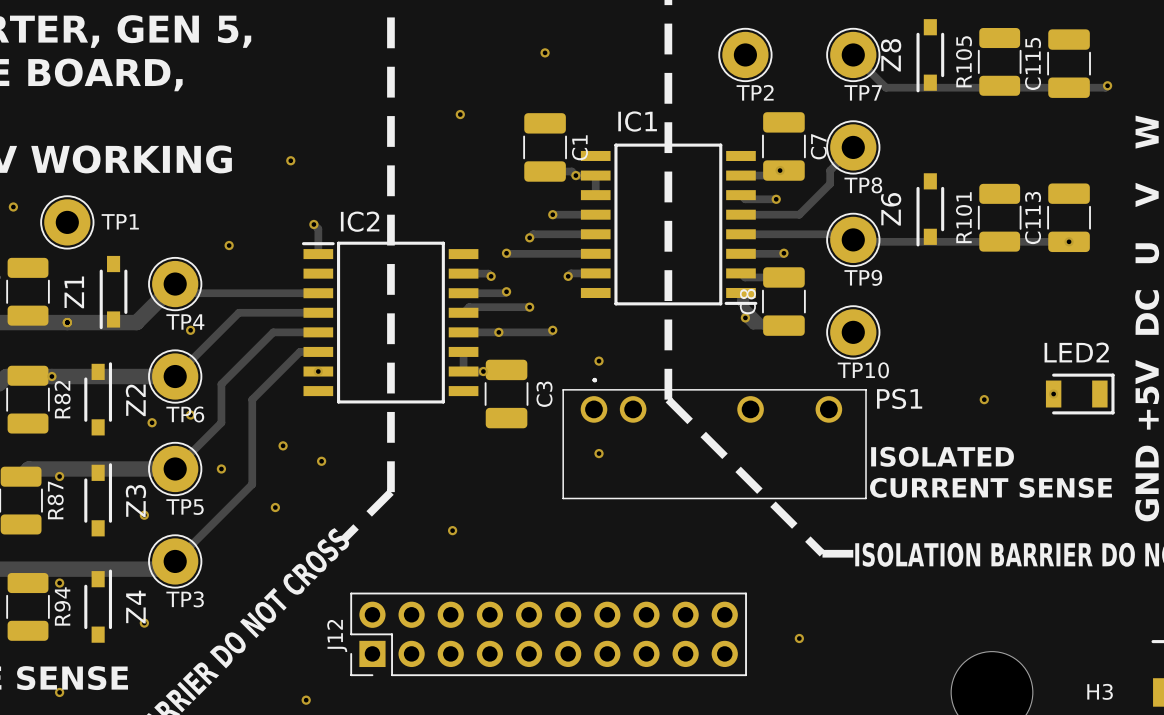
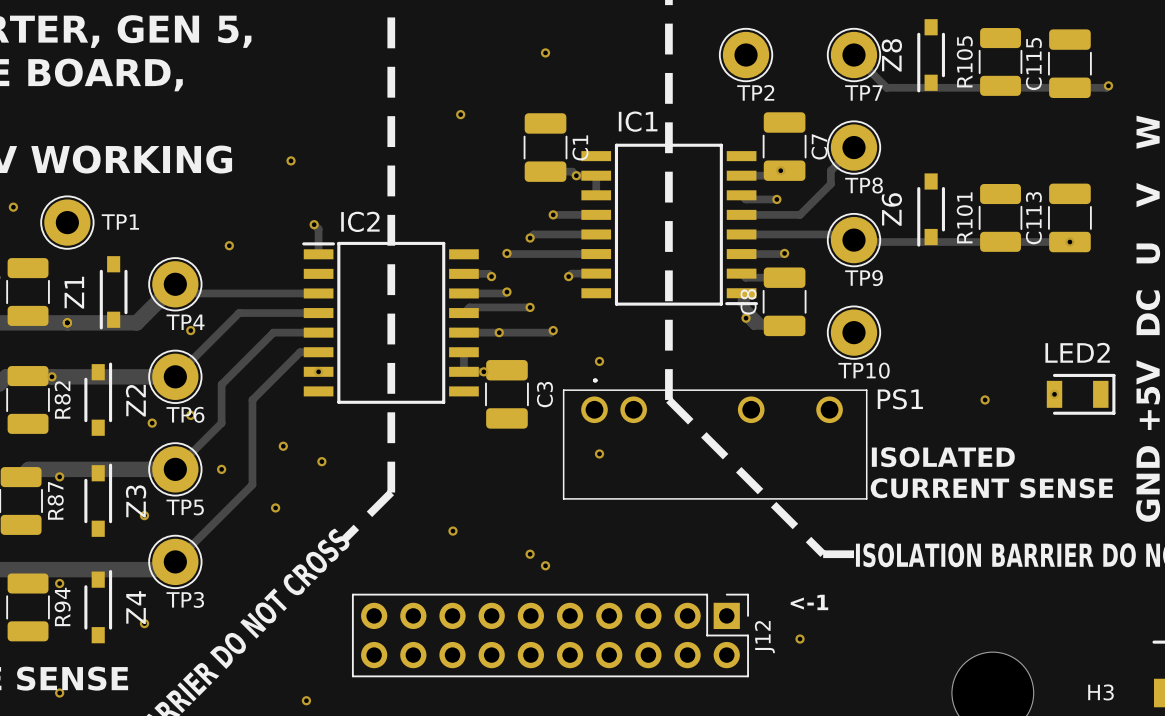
via: none -> (530, 554)
via: none -> (545, 565)
text: none -> <-1 (809, 602)
J12 rotation: 0° (548, 634) -> 180° (550, 635)

